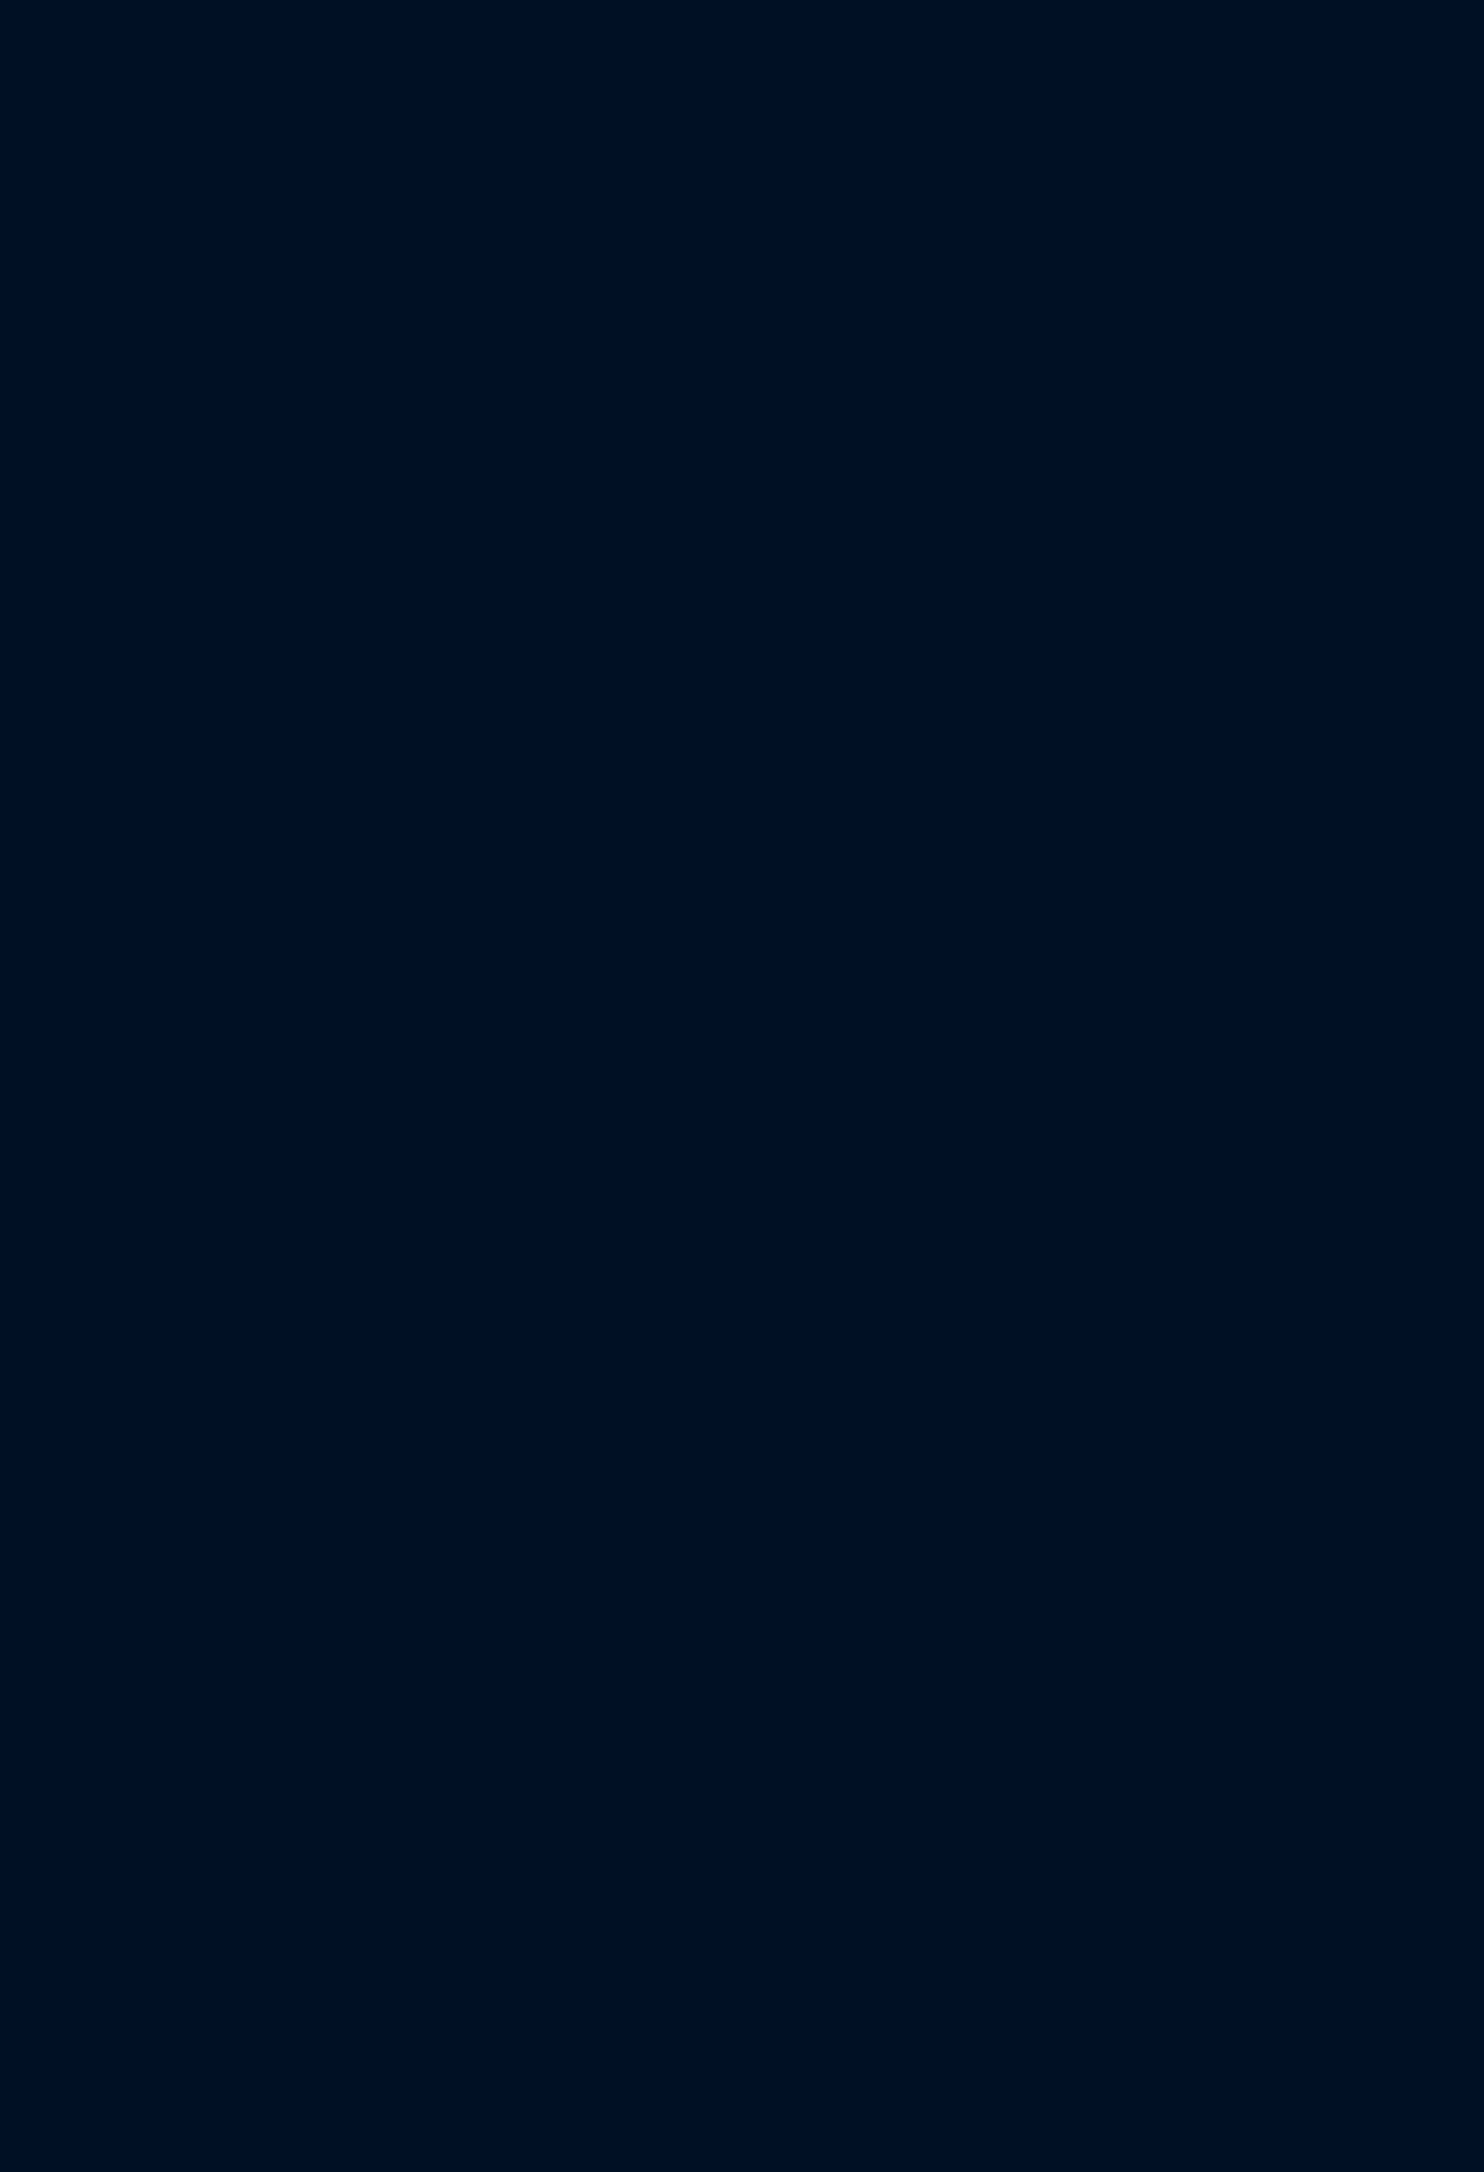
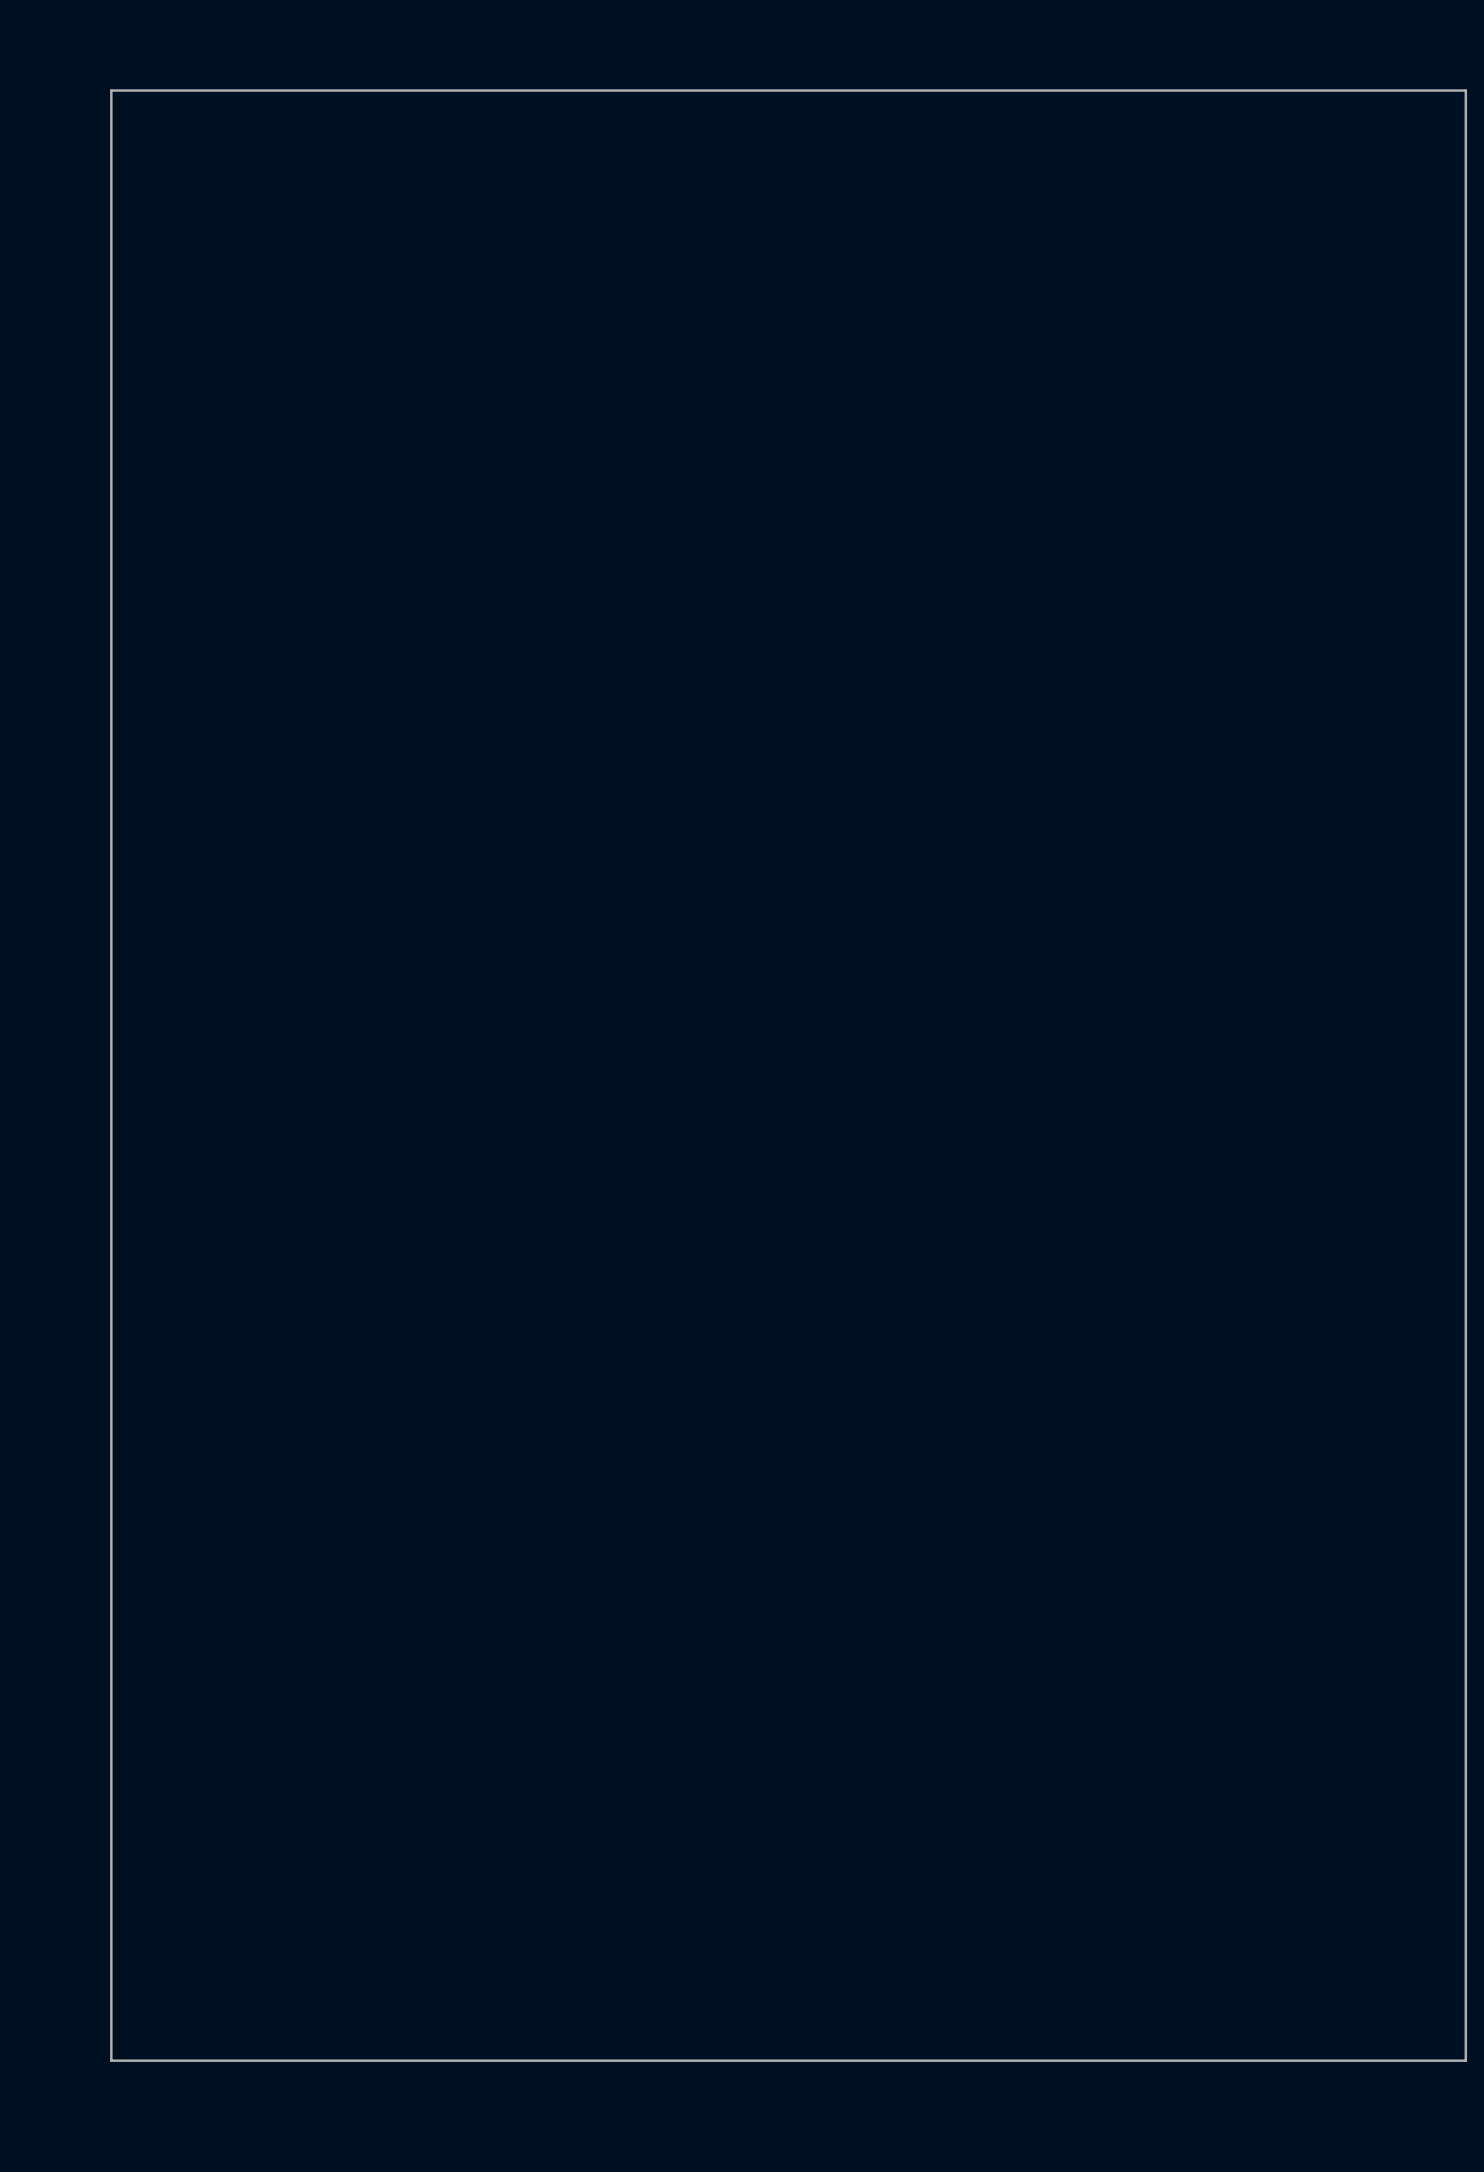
line: none -> (111, 90) (1465, 90) (1465, 2060) (111, 2060) (111, 90)

